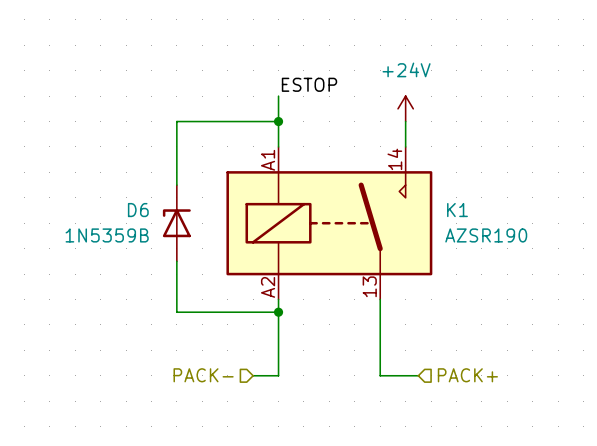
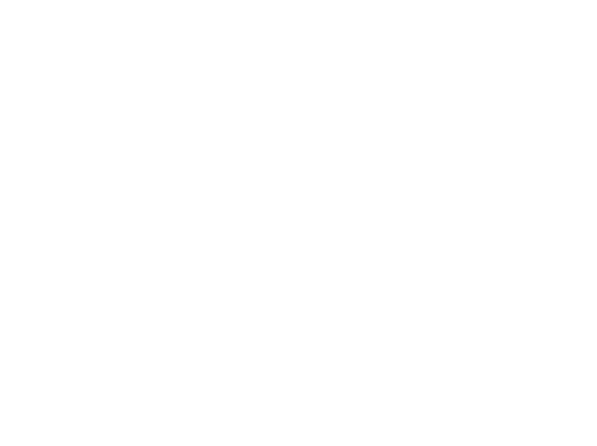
label: ESTOP (309, 84) -> none
wire: (278, 96) (278, 146) -> none
power symbol: +24V (405, 108) -> none
wire: (278, 121) (176, 121) (176, 185) -> none
junction: (278, 121) -> none
wire: (405, 121) (405, 146) -> none
D6: 1N5359B (176, 223) -> none
K1: AZSR190 (329, 223) -> none
wire: (176, 261) (176, 312) (278, 312) -> none
wire: (278, 299) (278, 375) (253, 375) -> none
wire: (380, 299) (380, 375) (418, 375) -> none
junction: (278, 312) -> none
hierarchical label: PACK- (203, 375) -> none
hierarchical label: PACK+ (467, 375) -> none

